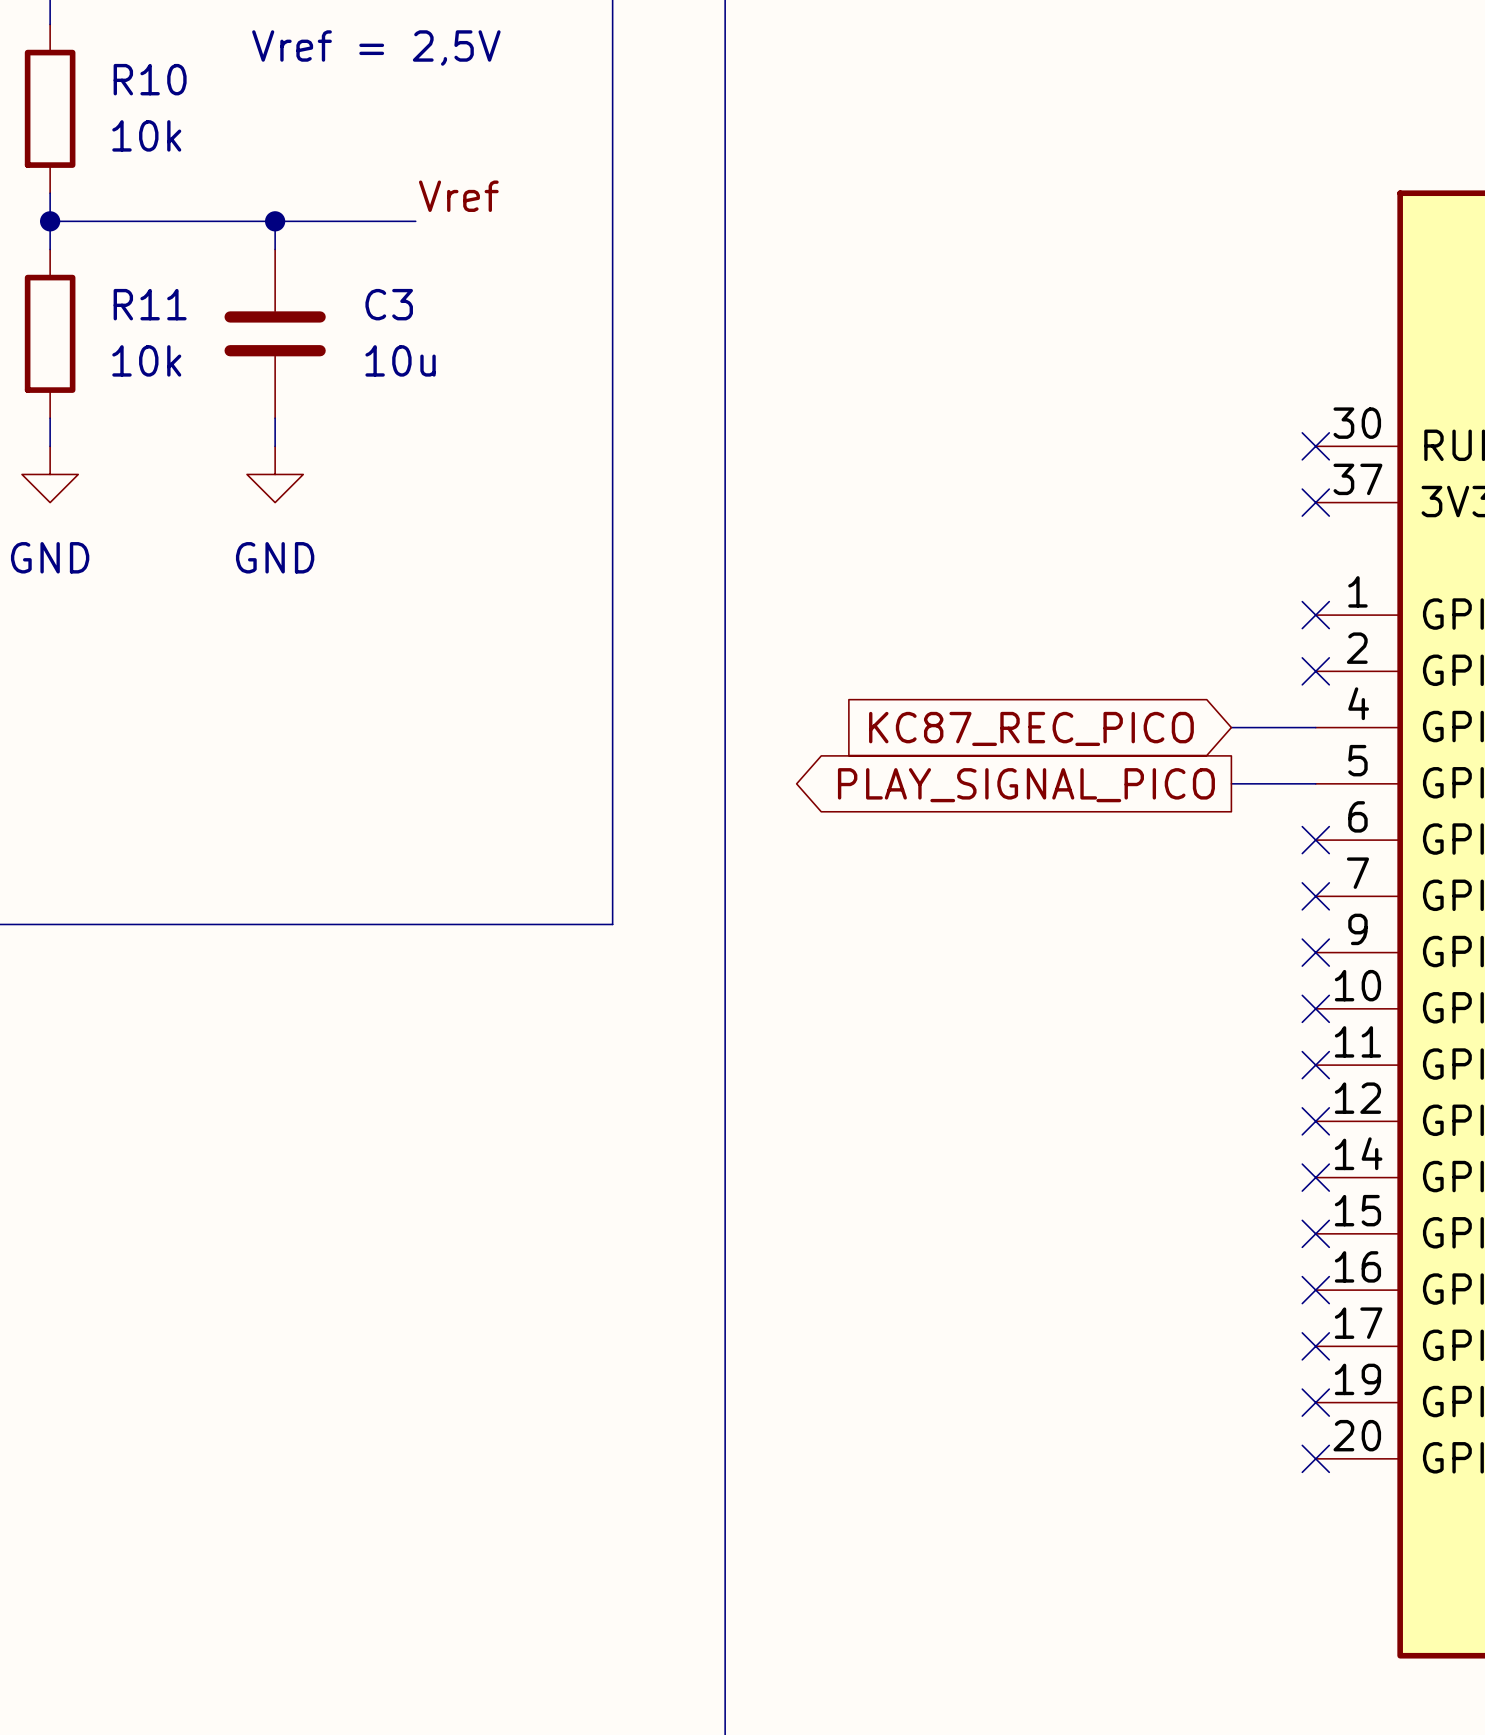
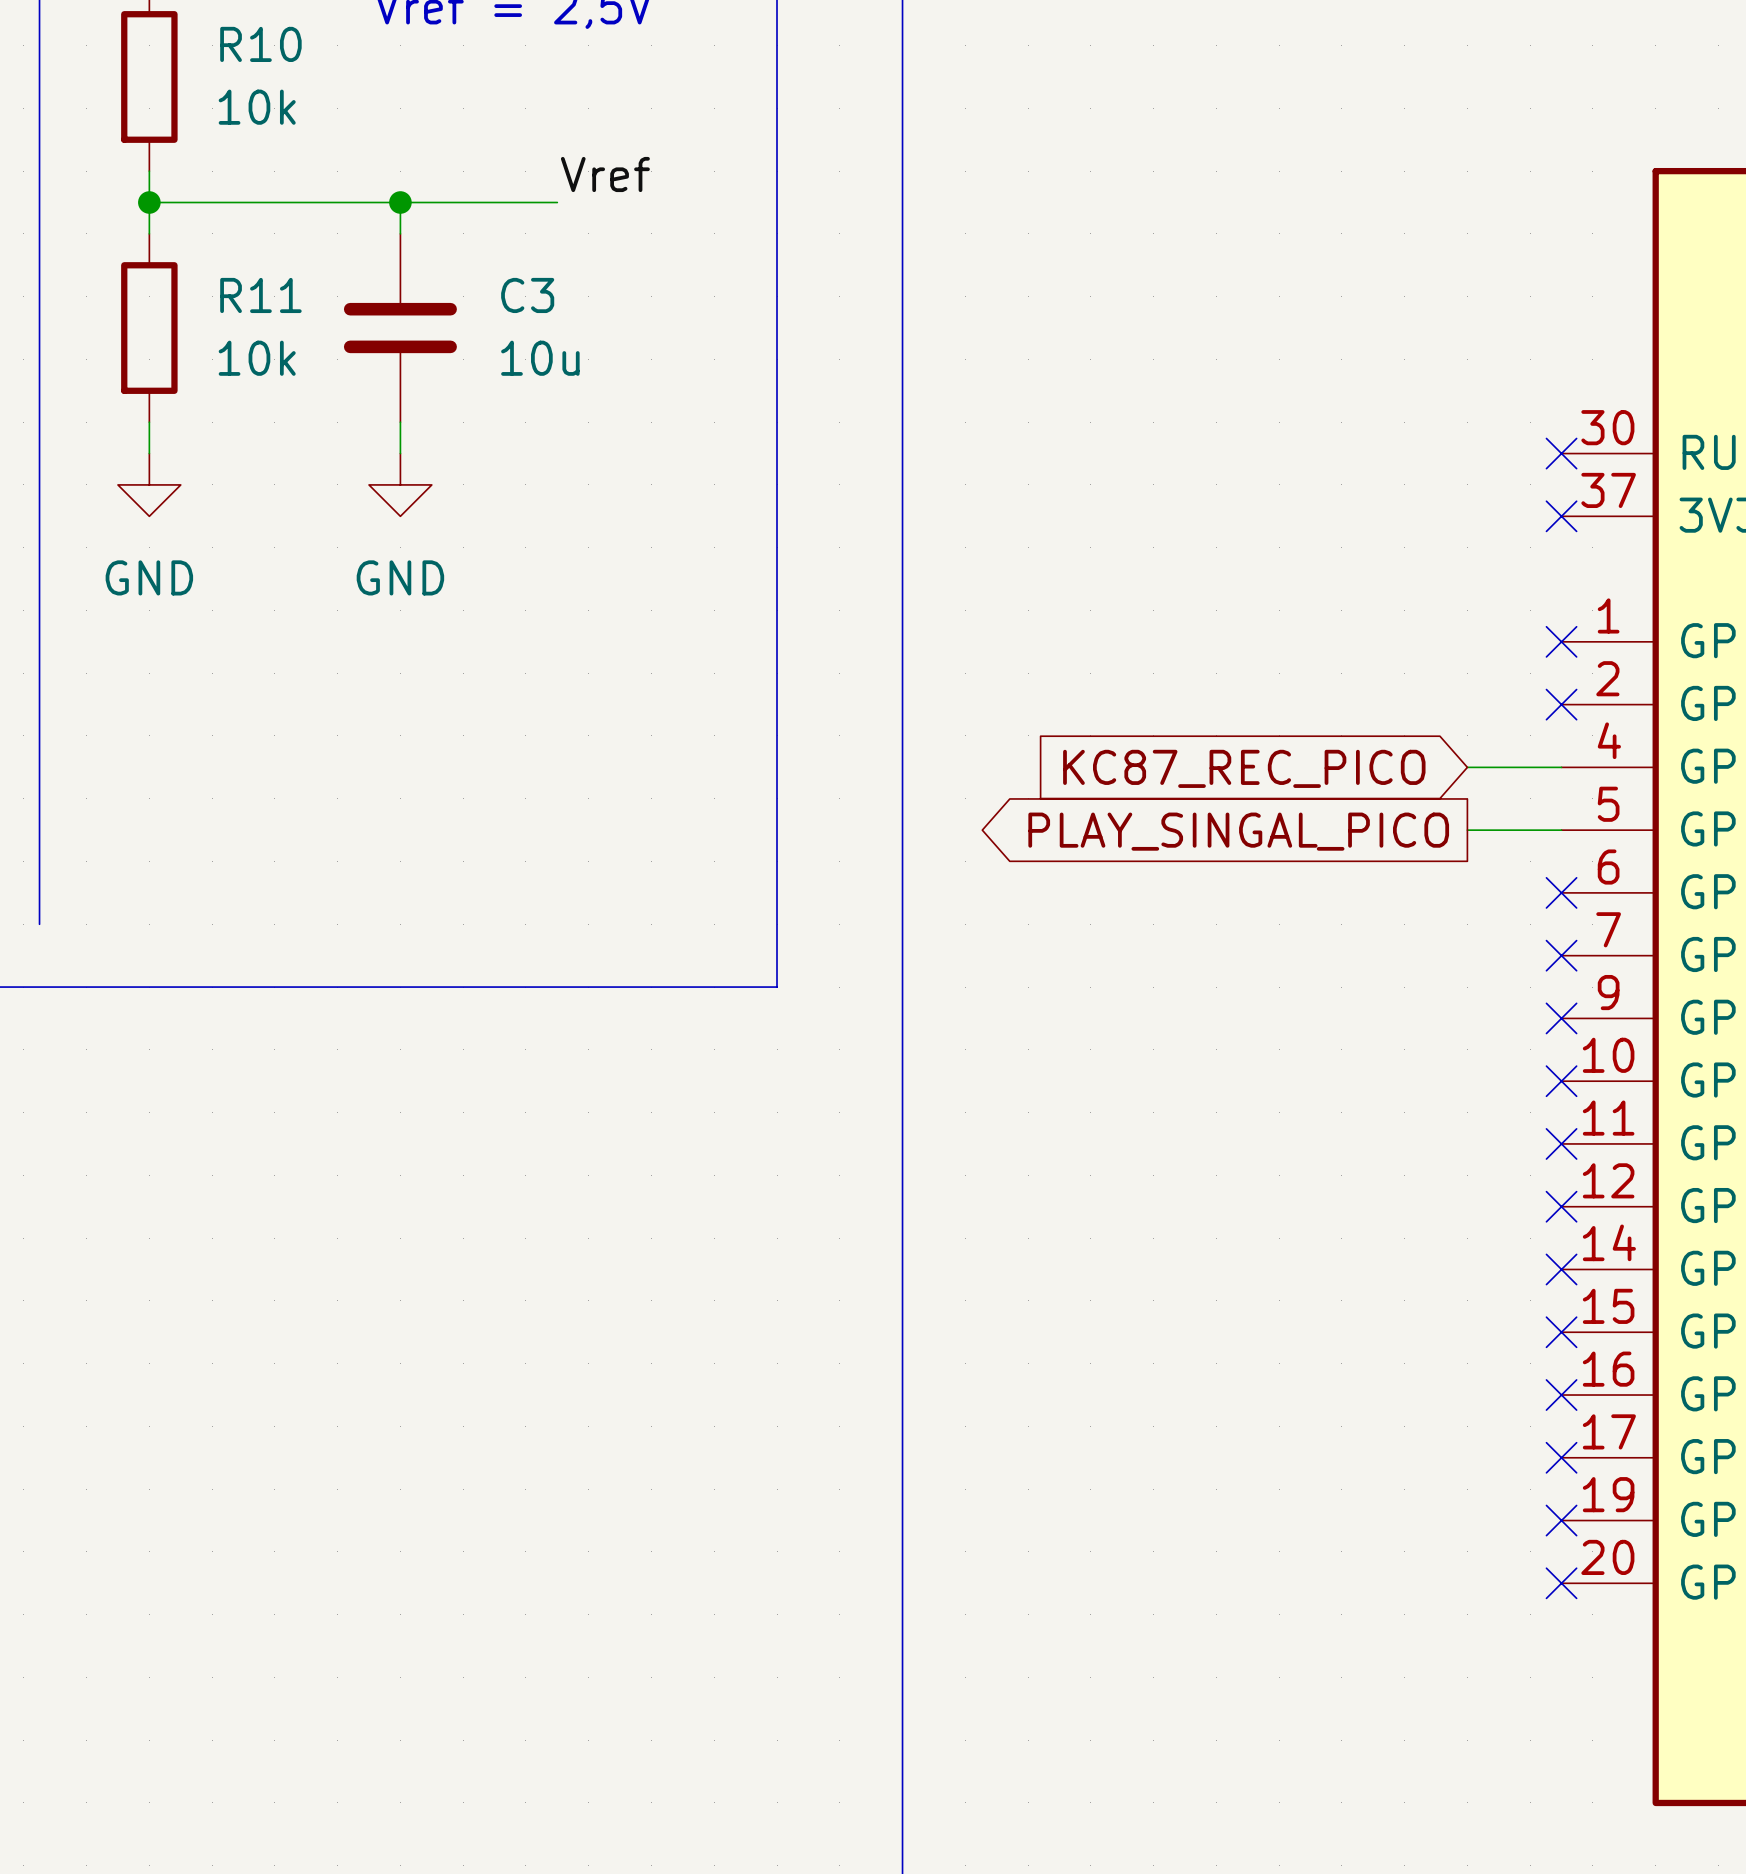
global label: PLAY_SIGNAL_PICO (1026, 785) -> PLAY_SINGAL_PICO (1238, 831)

